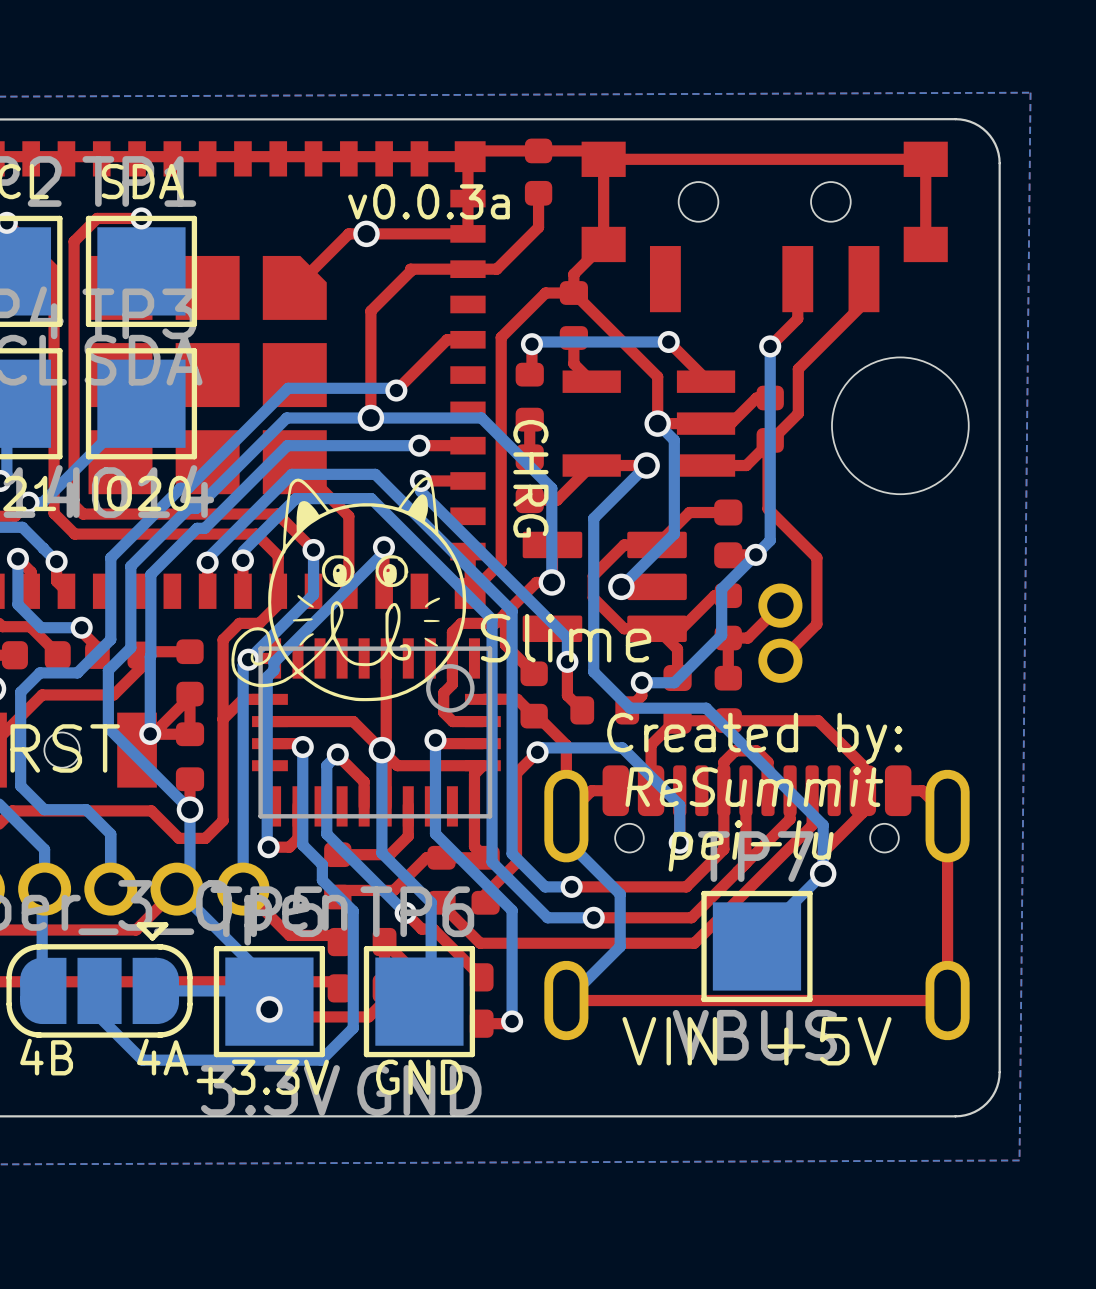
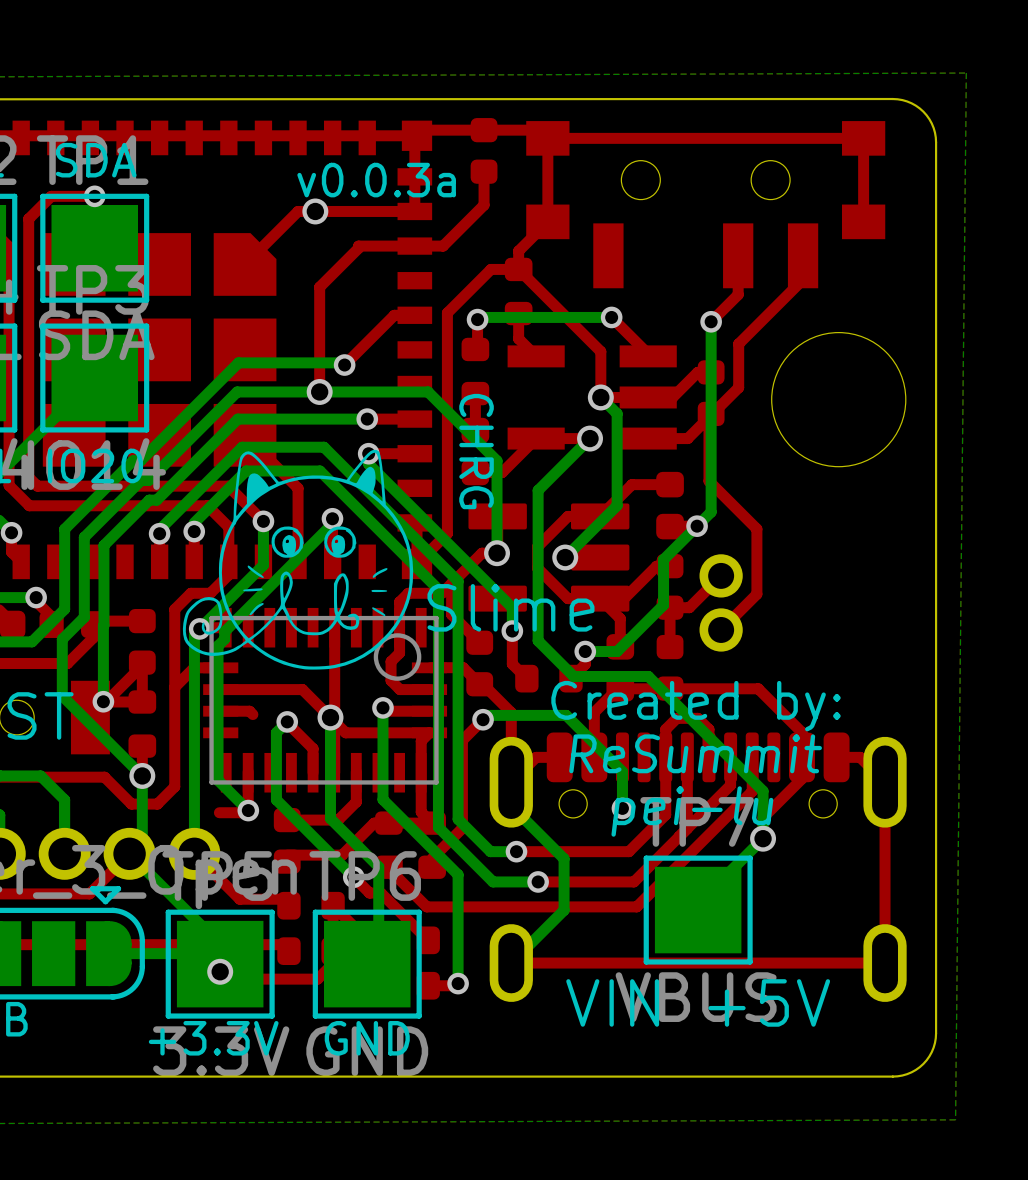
bottom track: (302, 747) (302, 845) (322, 864) (322, 880) (353, 911) (353, 1028) (321, 1060) (142, 1060) (99, 1017) (99, 990) -> none
via: (302, 747) -> none
bottom track: (267, 814) (268, 847) -> (218, 780) (248, 810)
via position: (268, 847) -> (248, 810)
text: 4A (162, 1057) -> none

